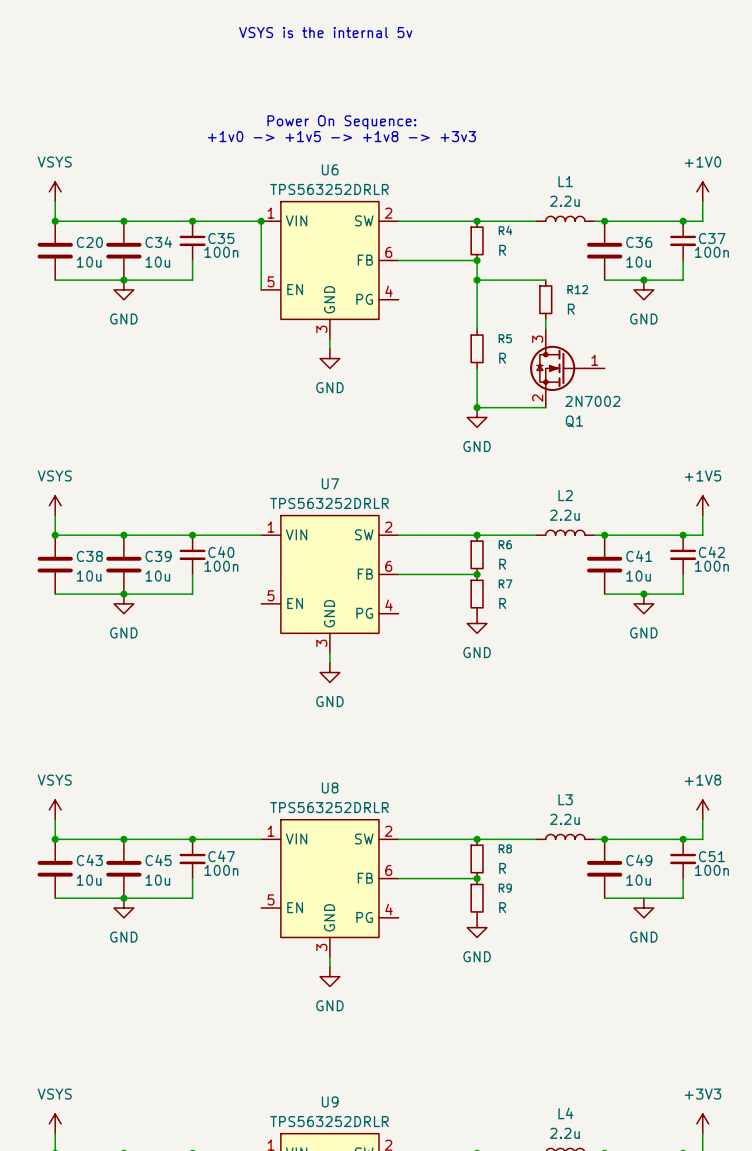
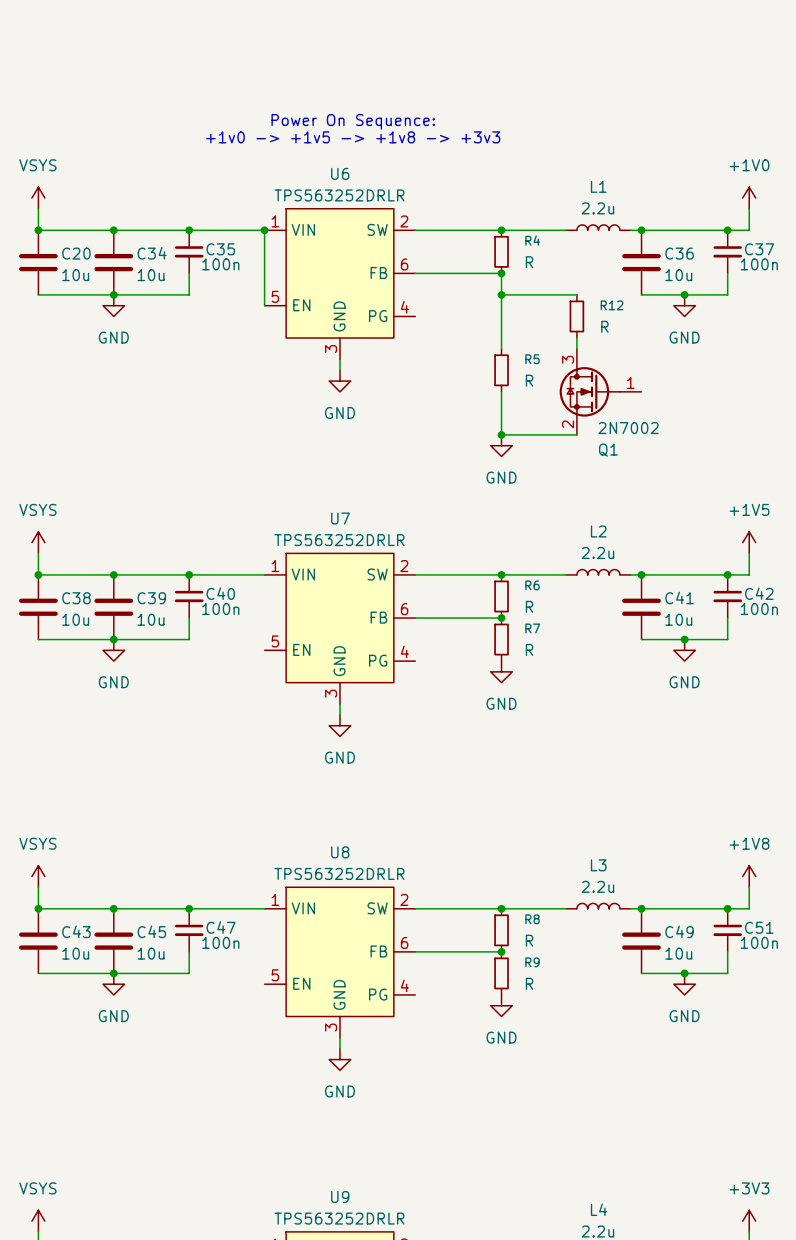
text: VSYS is the internal 5v (325, 32) -> none
junction: none -> (684, 973)

